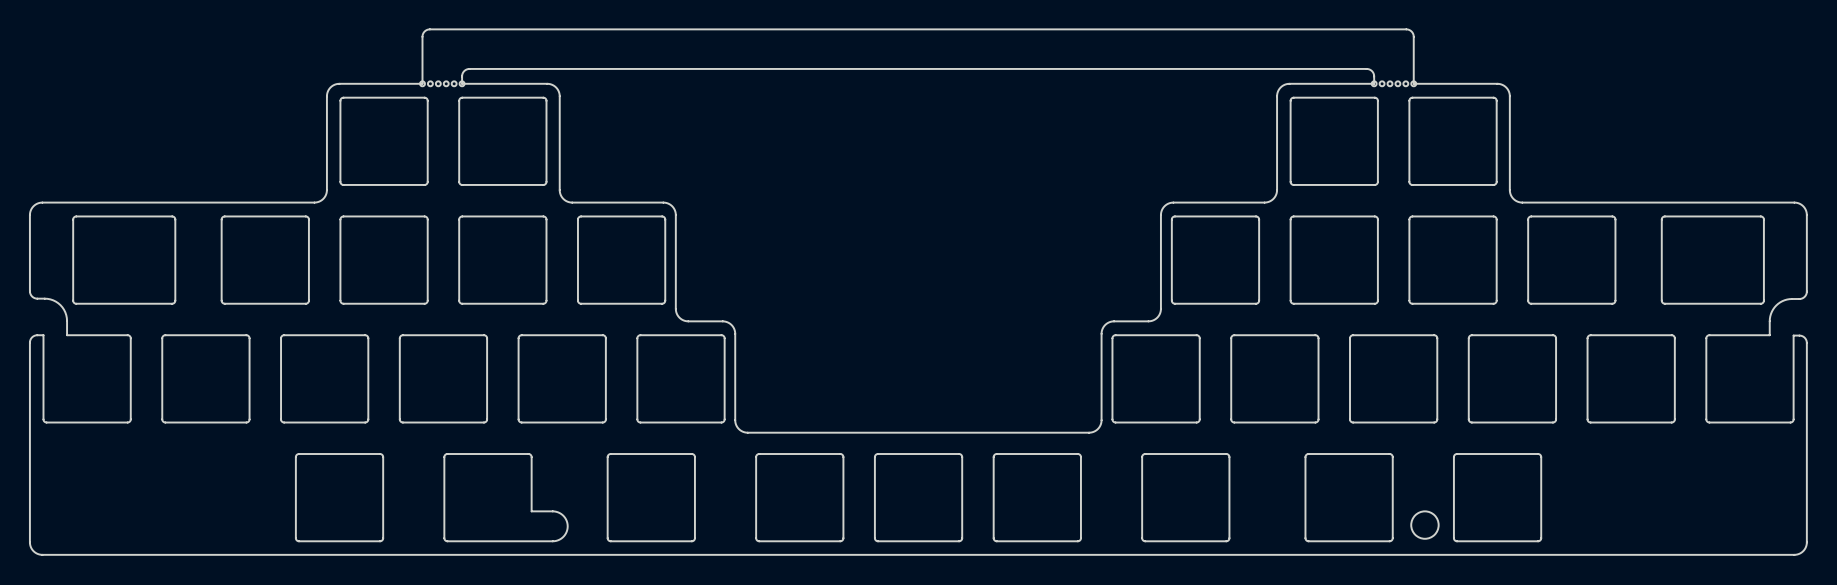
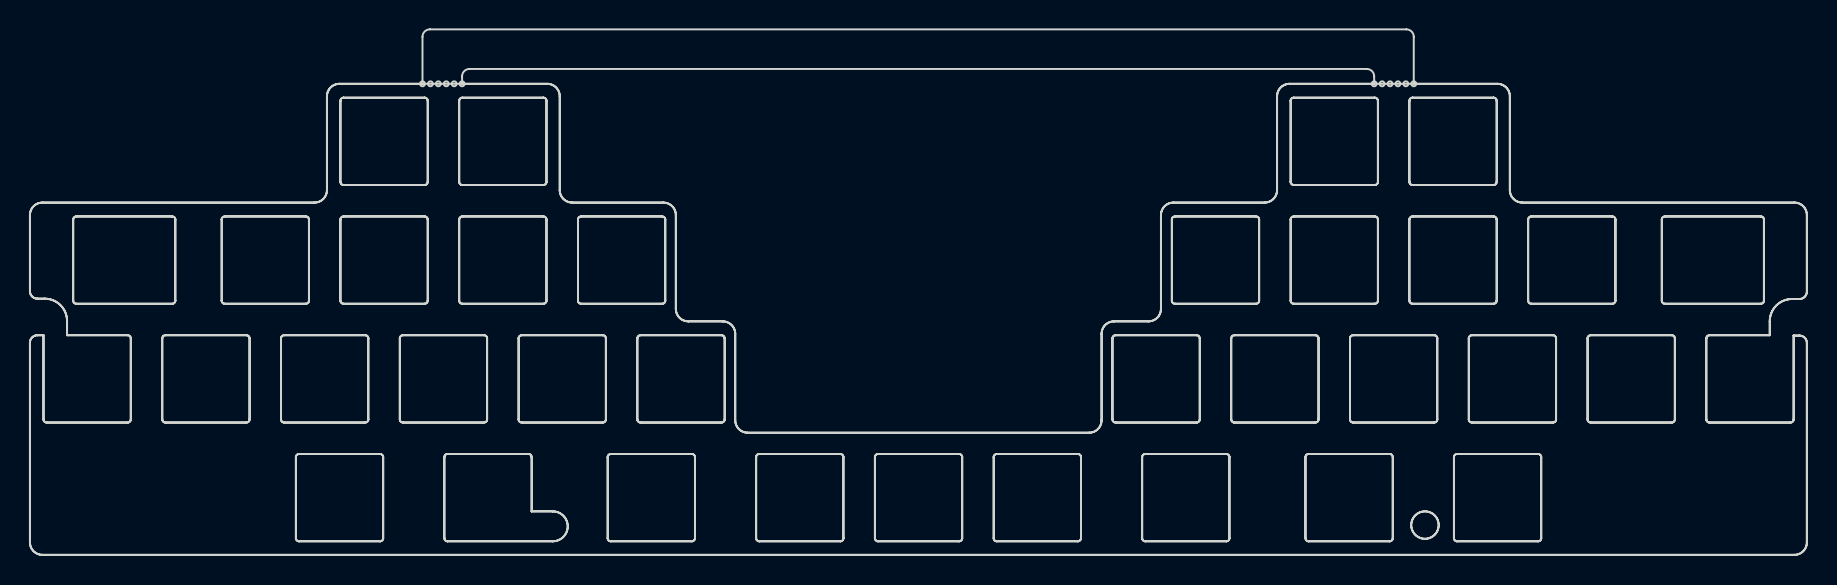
drawing: none -> [28, 82, 1808, 556]

